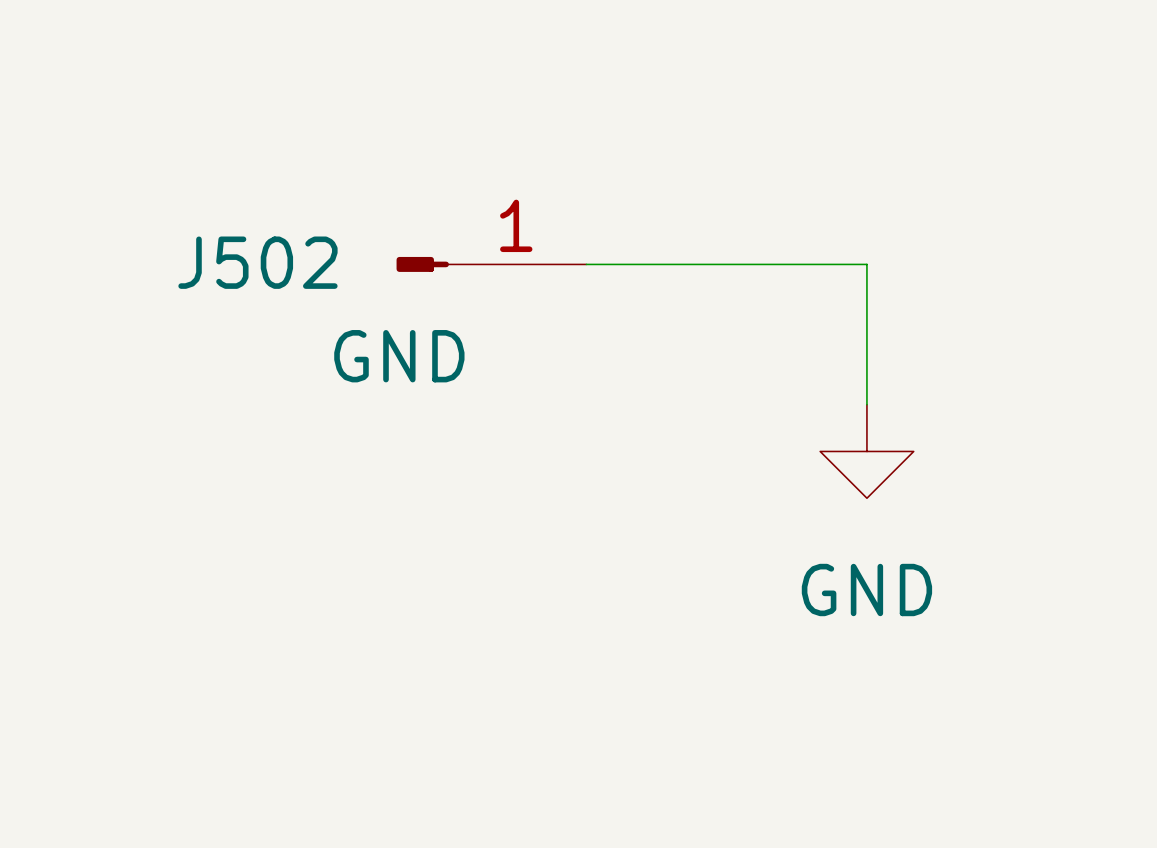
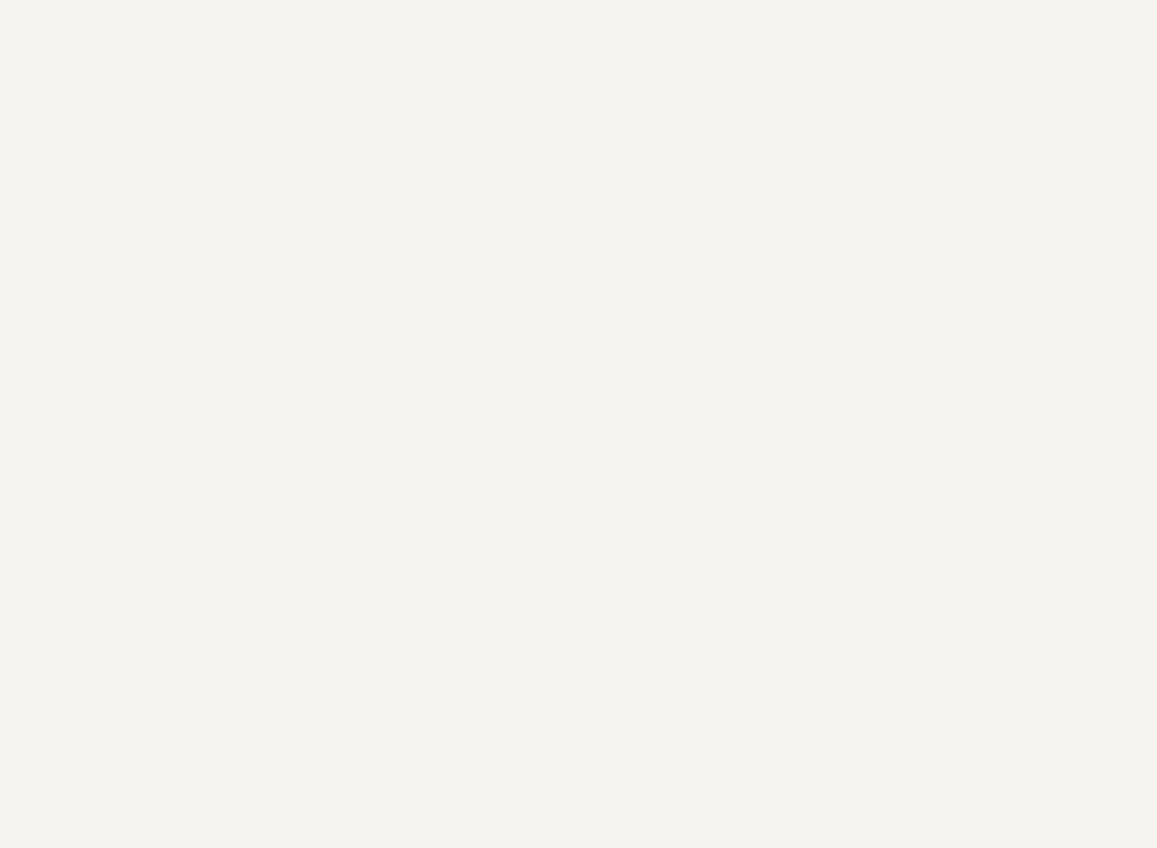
J502: GND (491, 264) -> none
wire: (586, 264) (866, 264) (866, 404) -> none
power symbol: GND (866, 451) -> none

